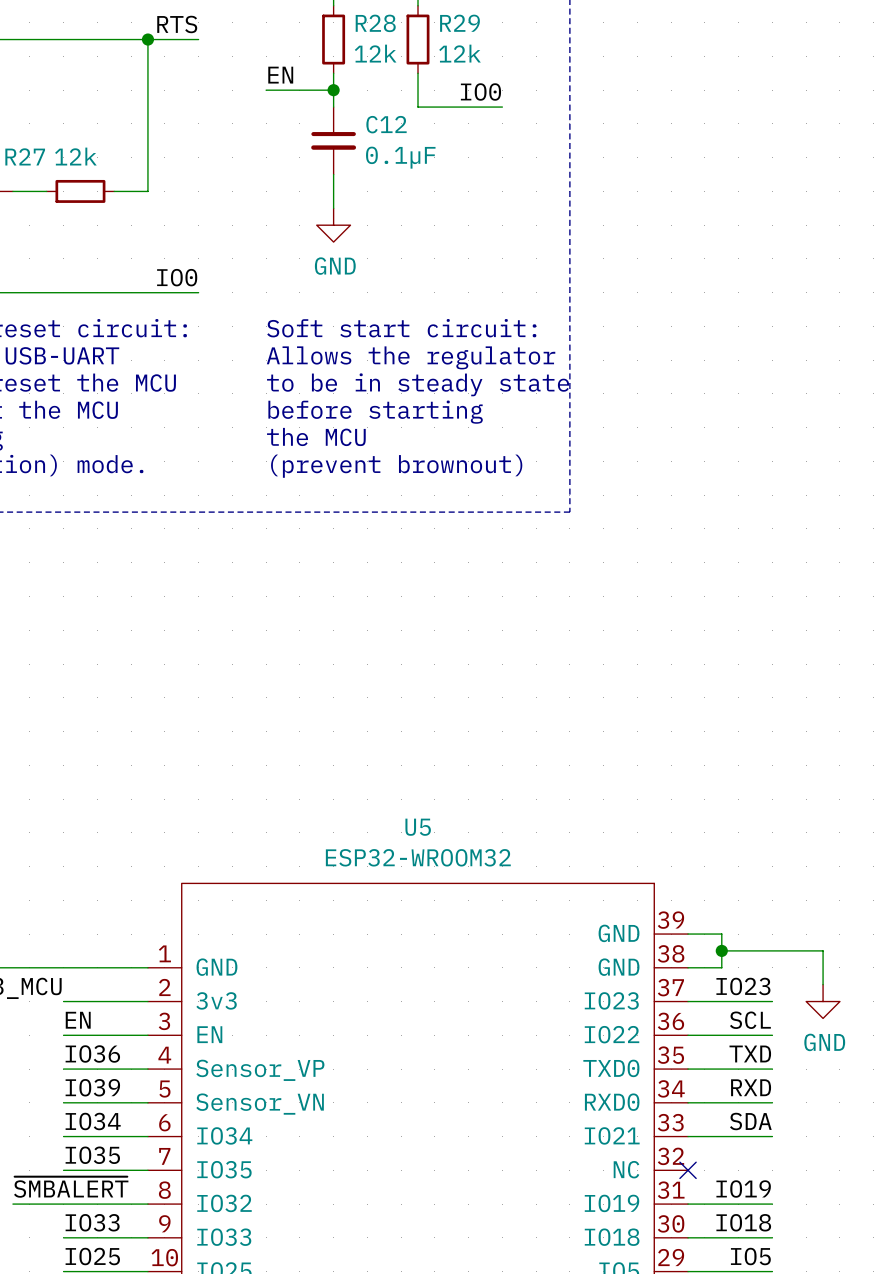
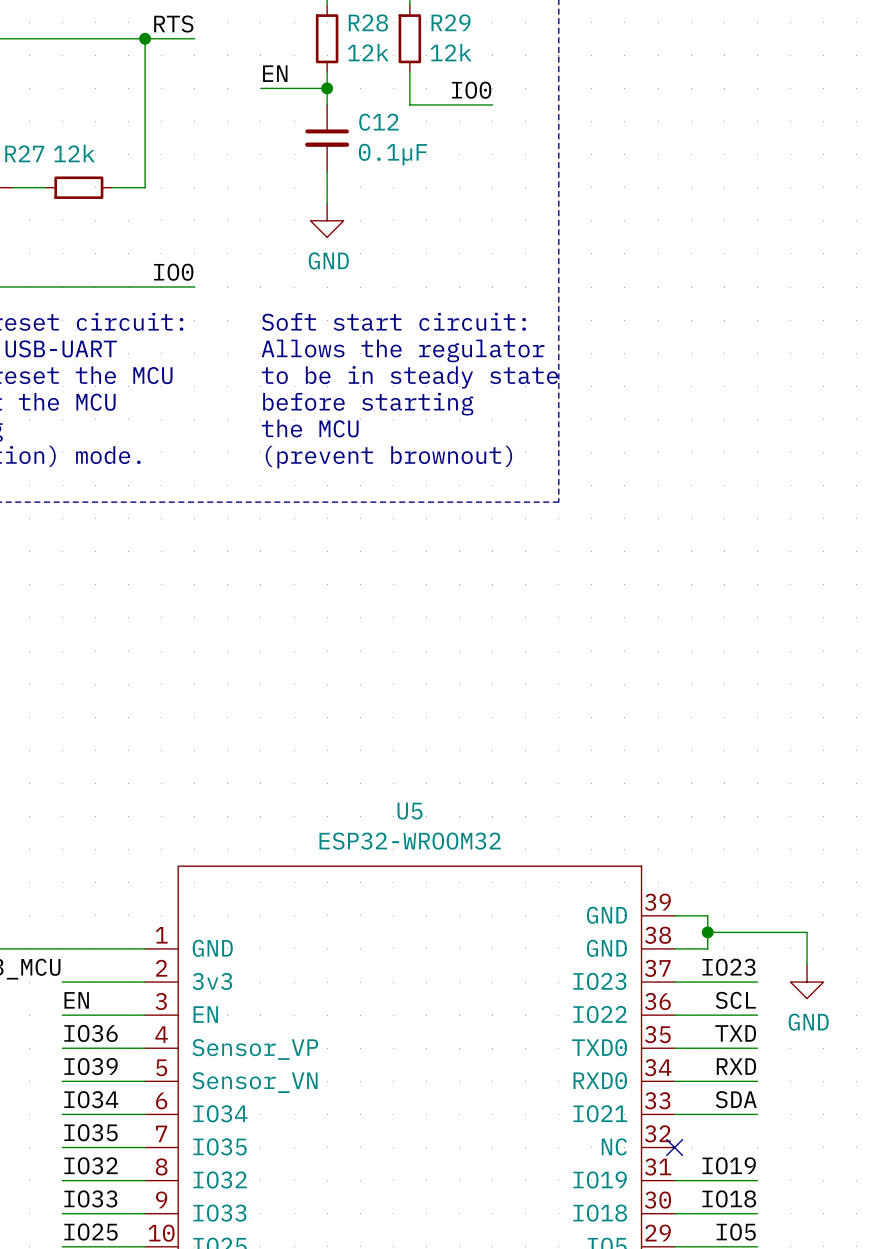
label: ~{SMBALERT} (71, 1187) -> none
label: none -> IO32 (91, 1165)
wire: (12, 1204) (63, 1204) -> none

